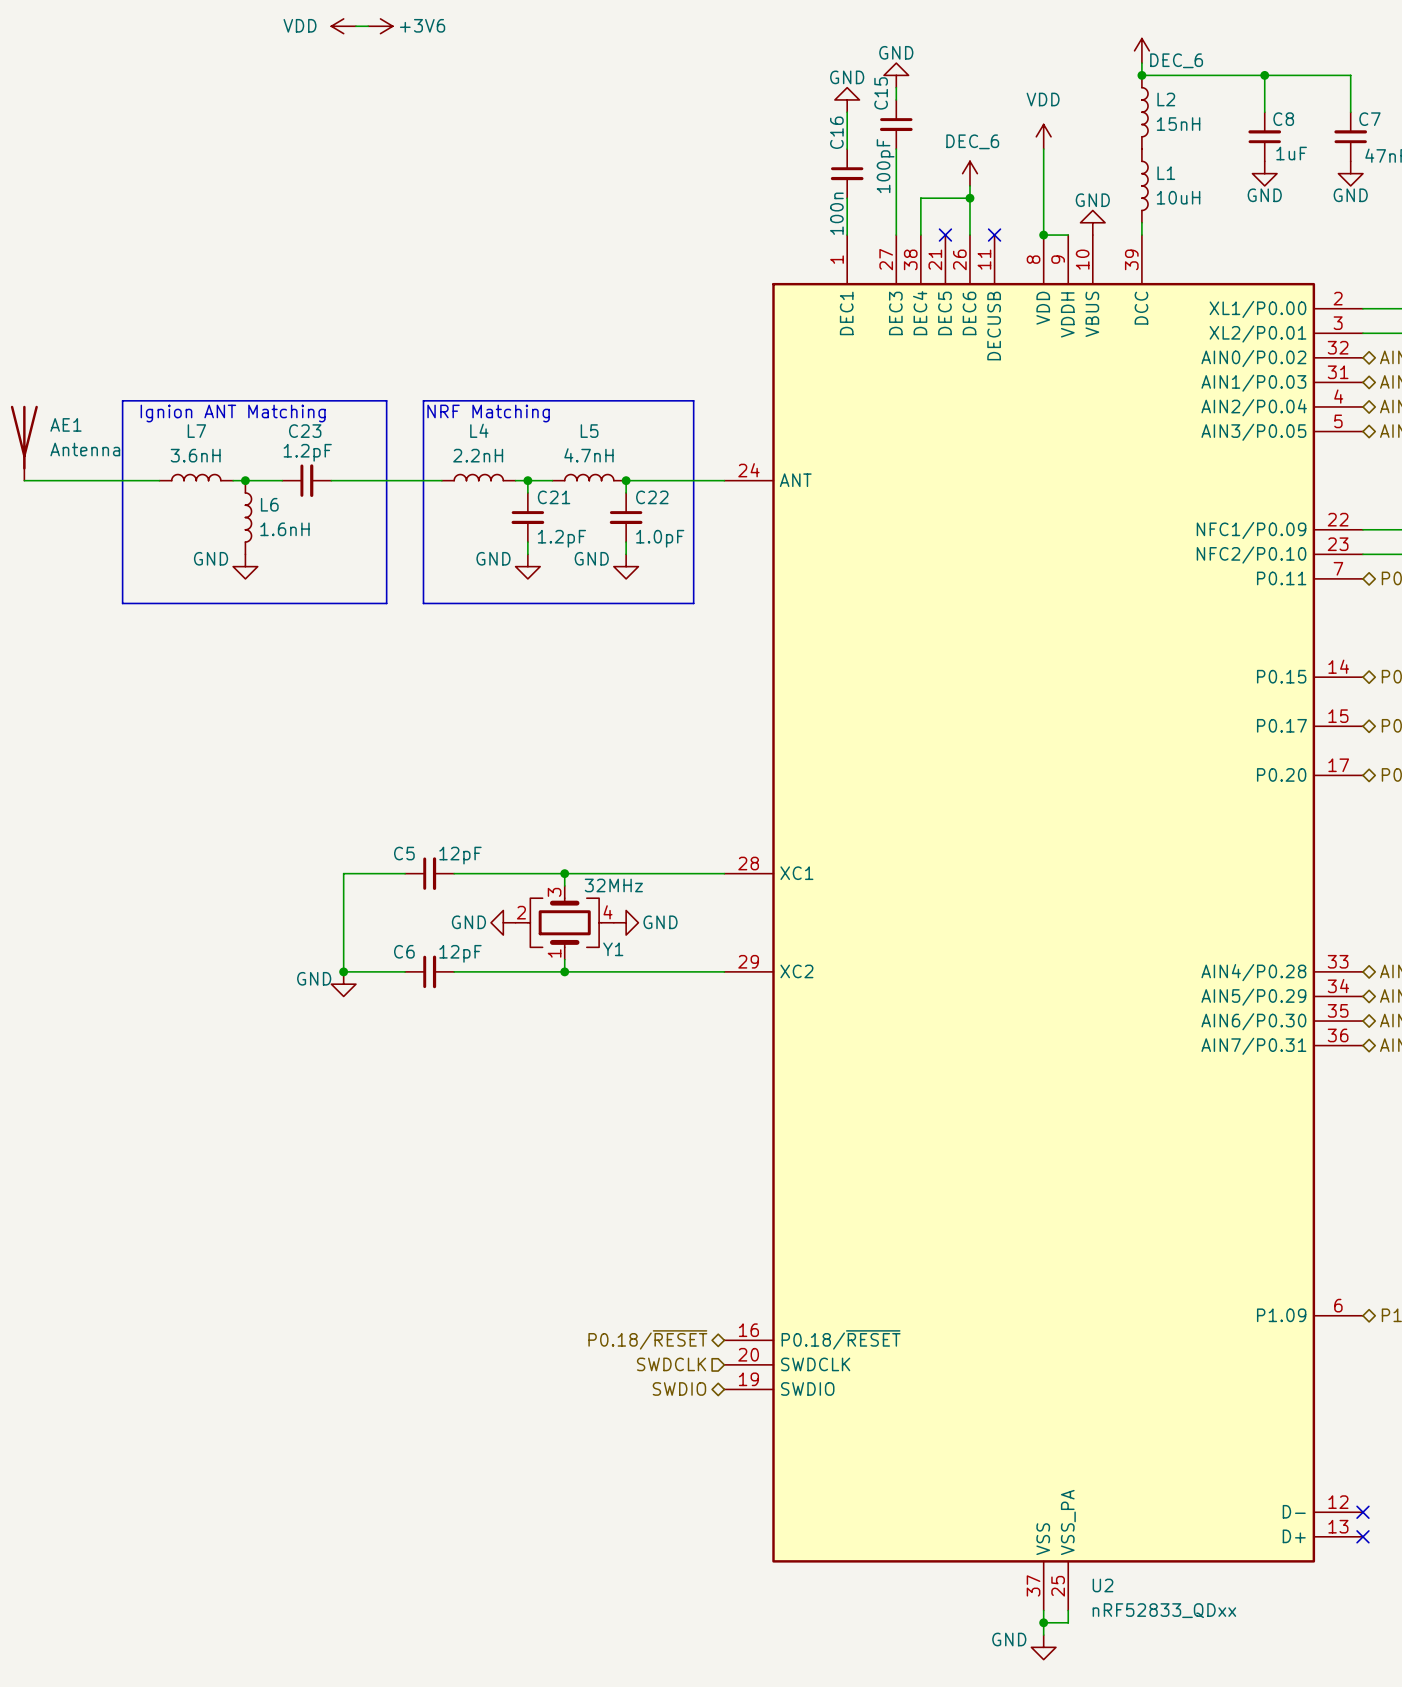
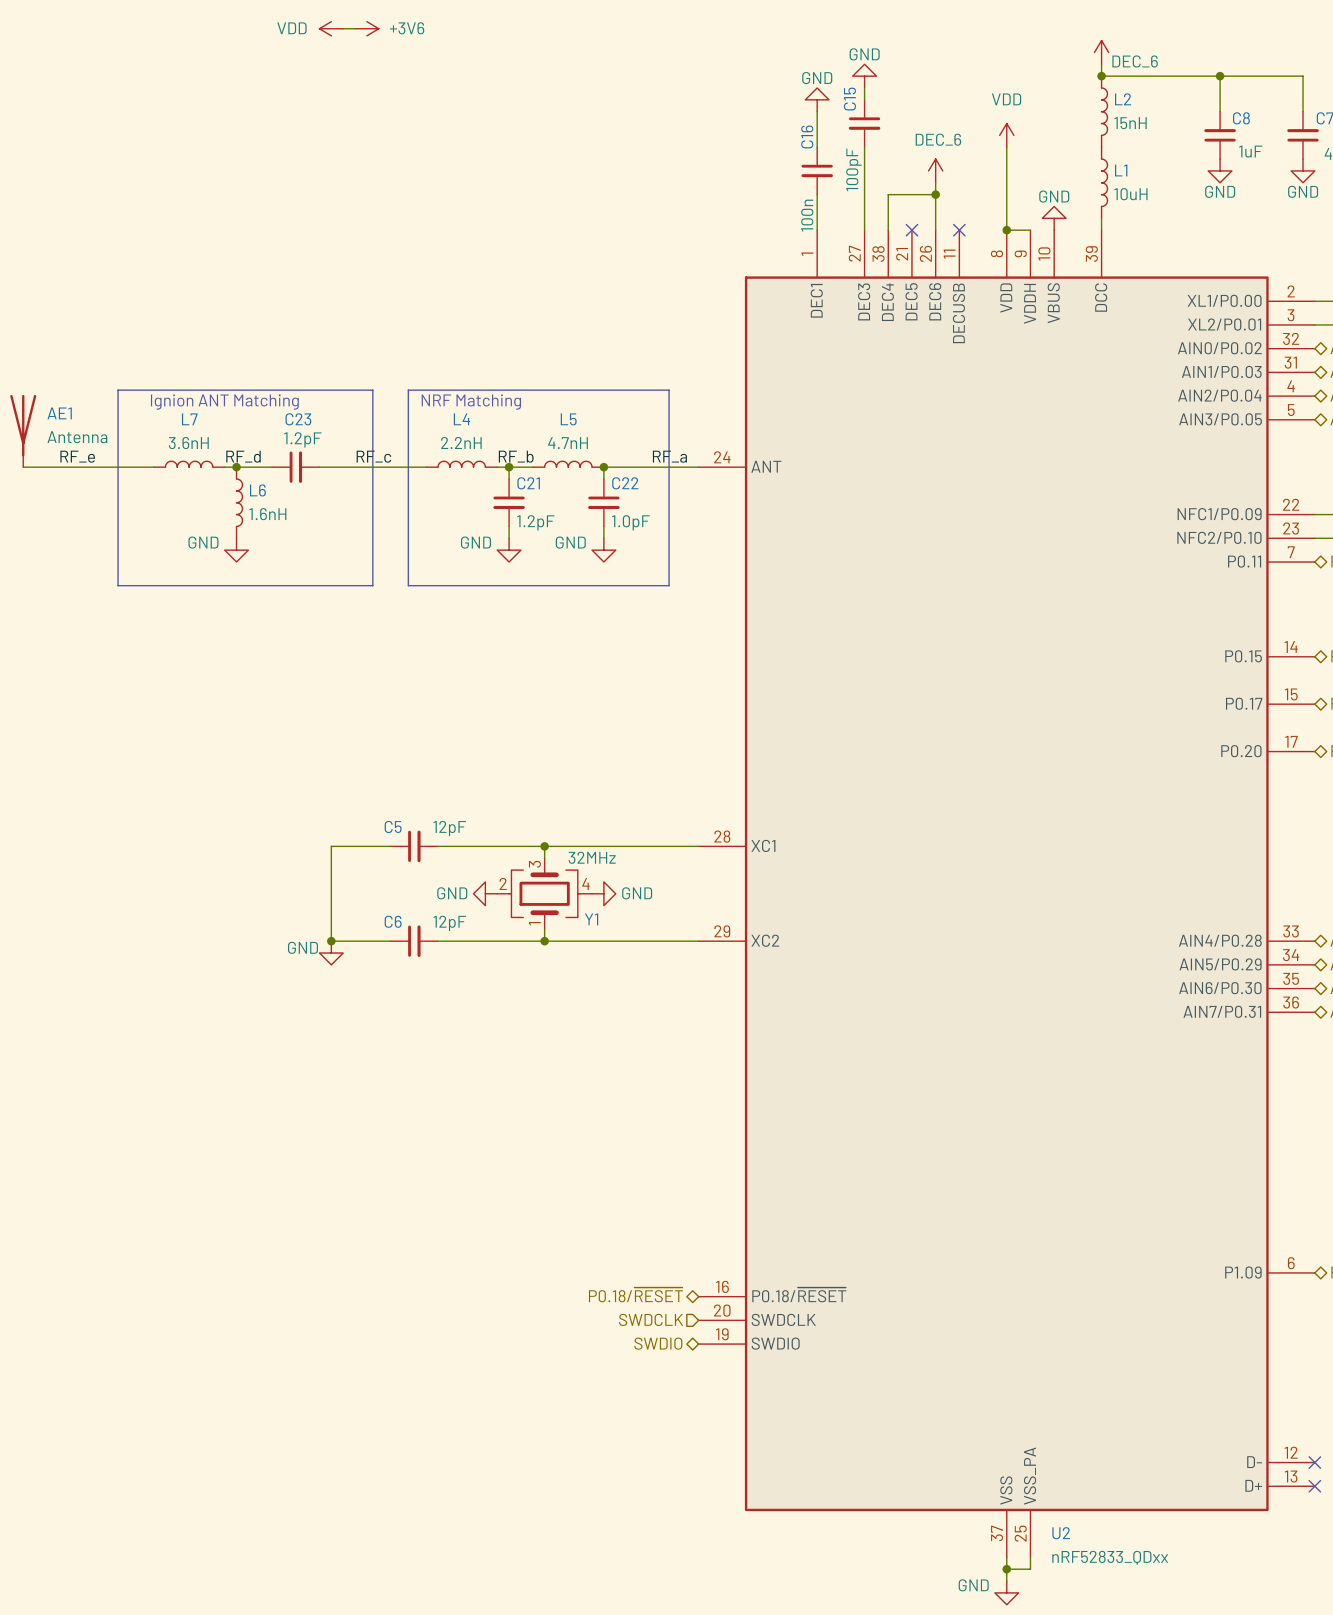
label: none -> RF_e (77, 456)
label: none -> RF_d (243, 456)
label: none -> RF_c (373, 456)
label: none -> RF_b (516, 456)
label: none -> RF_a (669, 456)

